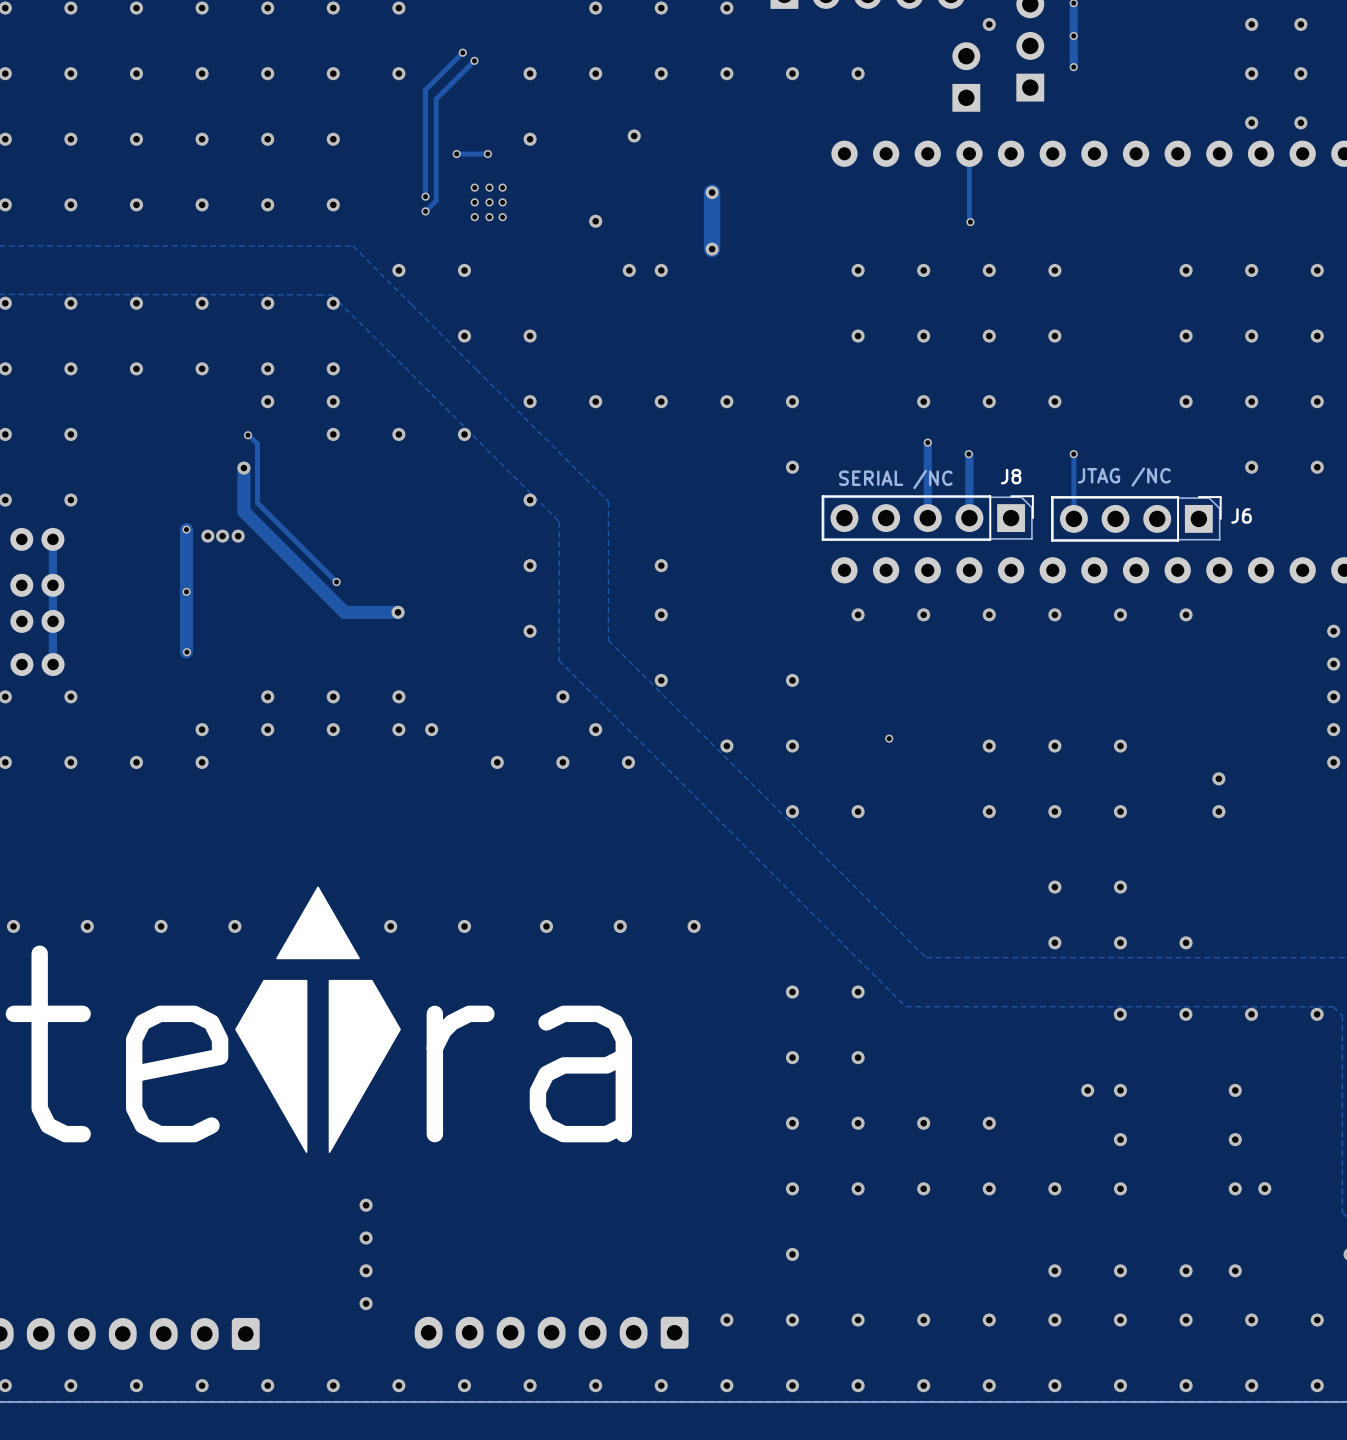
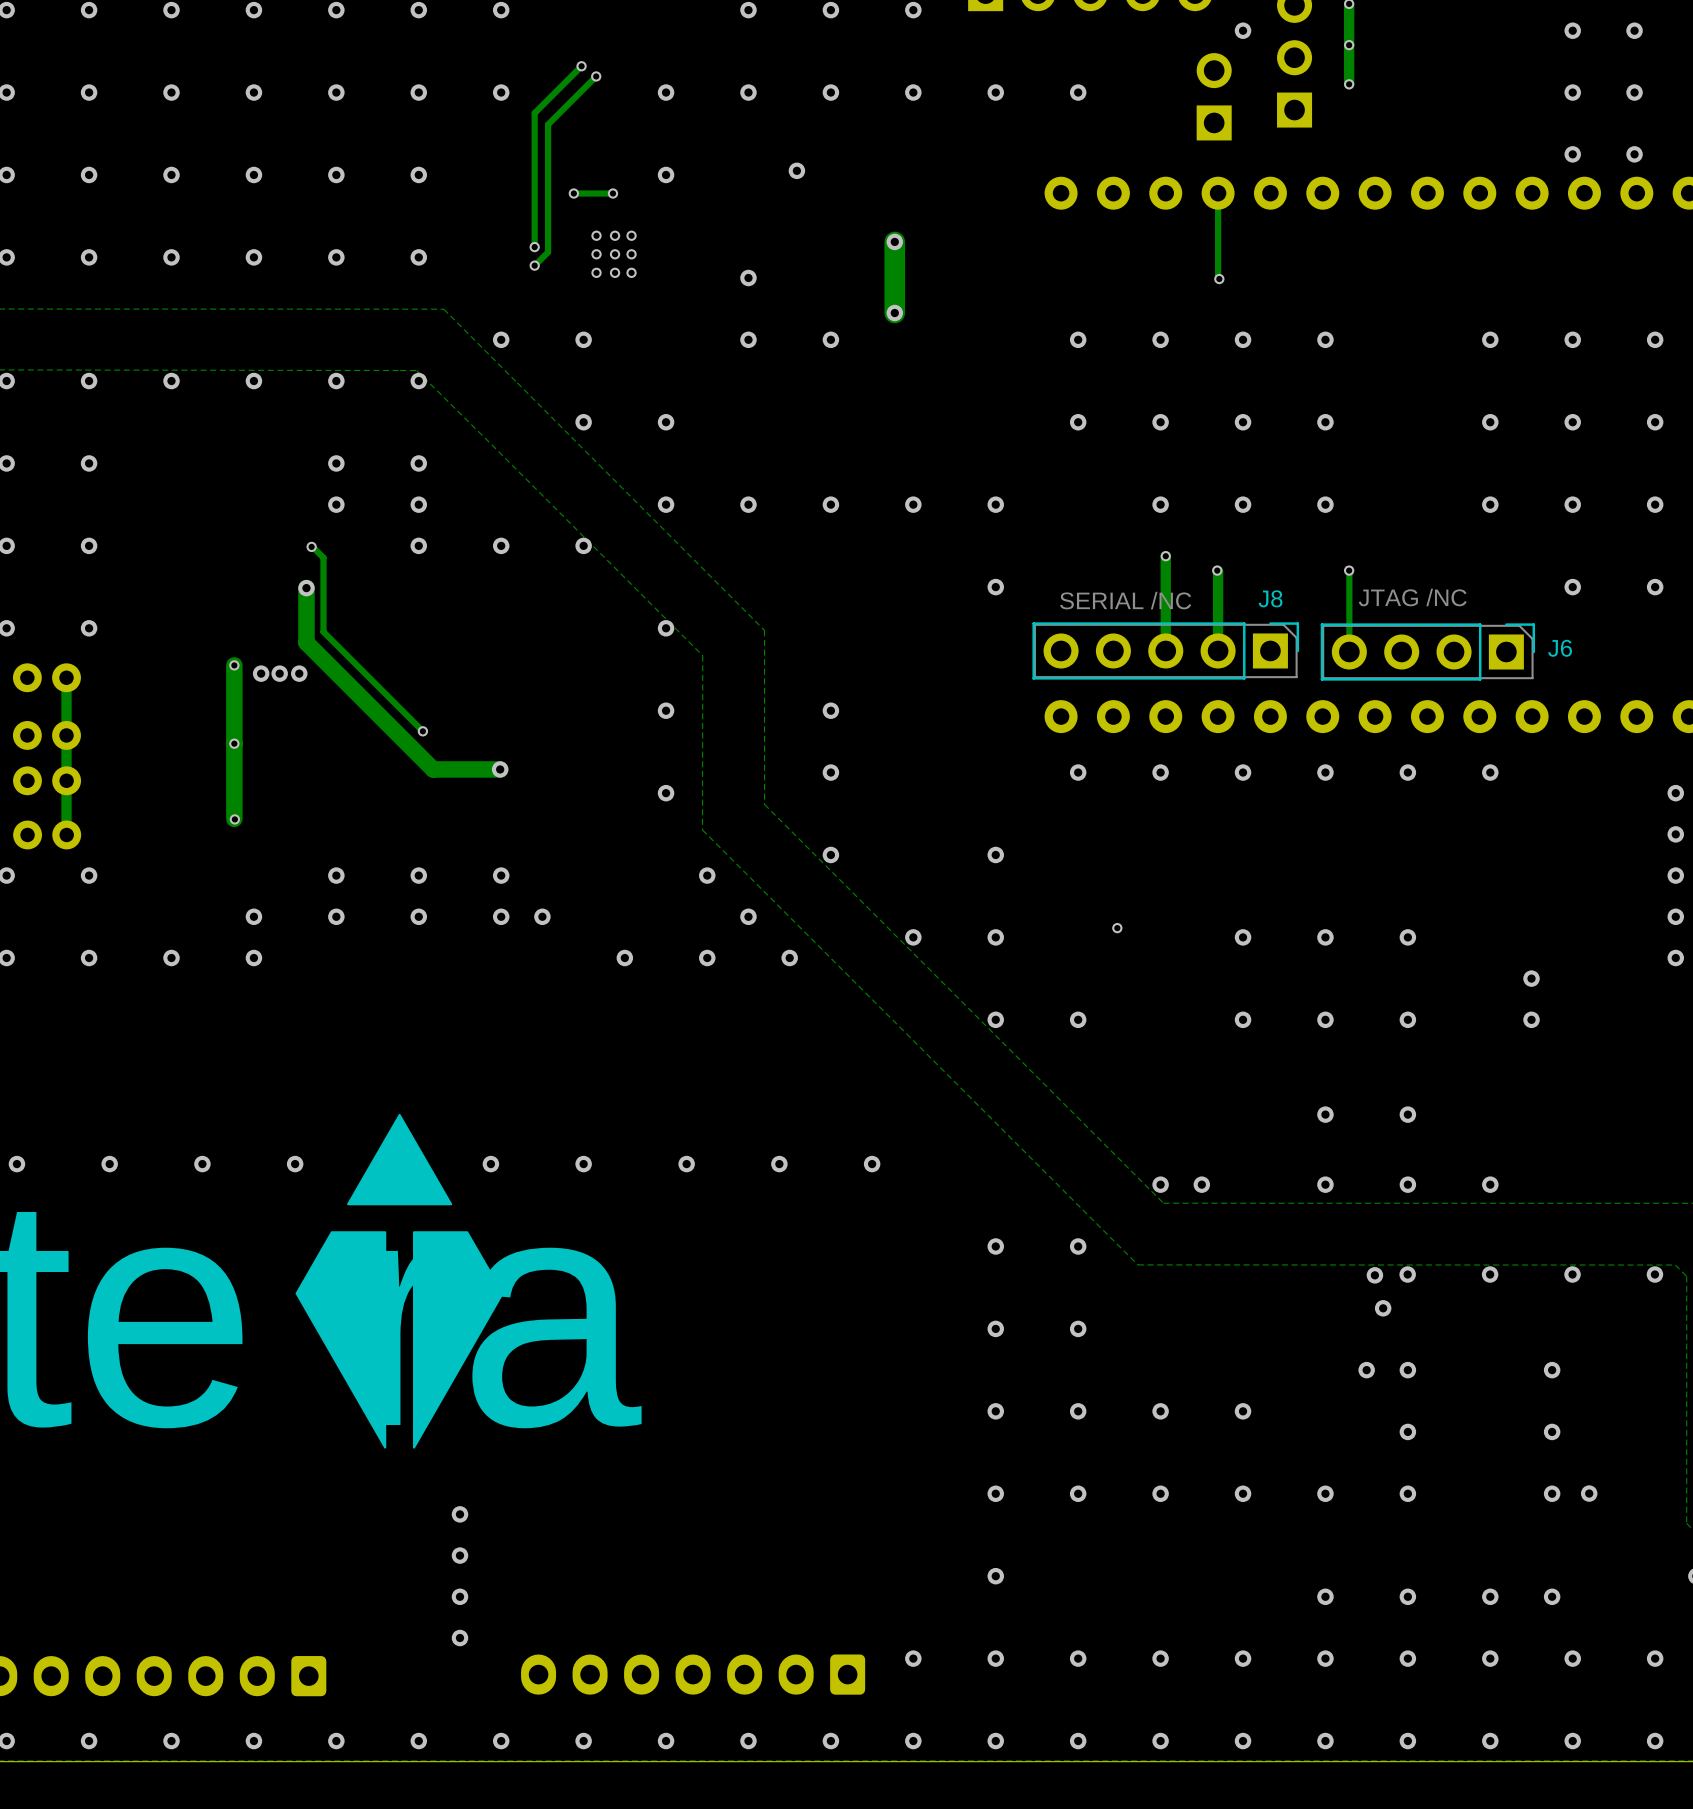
via position: (629, 270) -> (748, 339)
via: (136, 368) -> none
via: (202, 368) -> none
via: none -> (1160, 1184)
via: none -> (1201, 1184)
via: none -> (1374, 1275)
via: none -> (1383, 1308)

